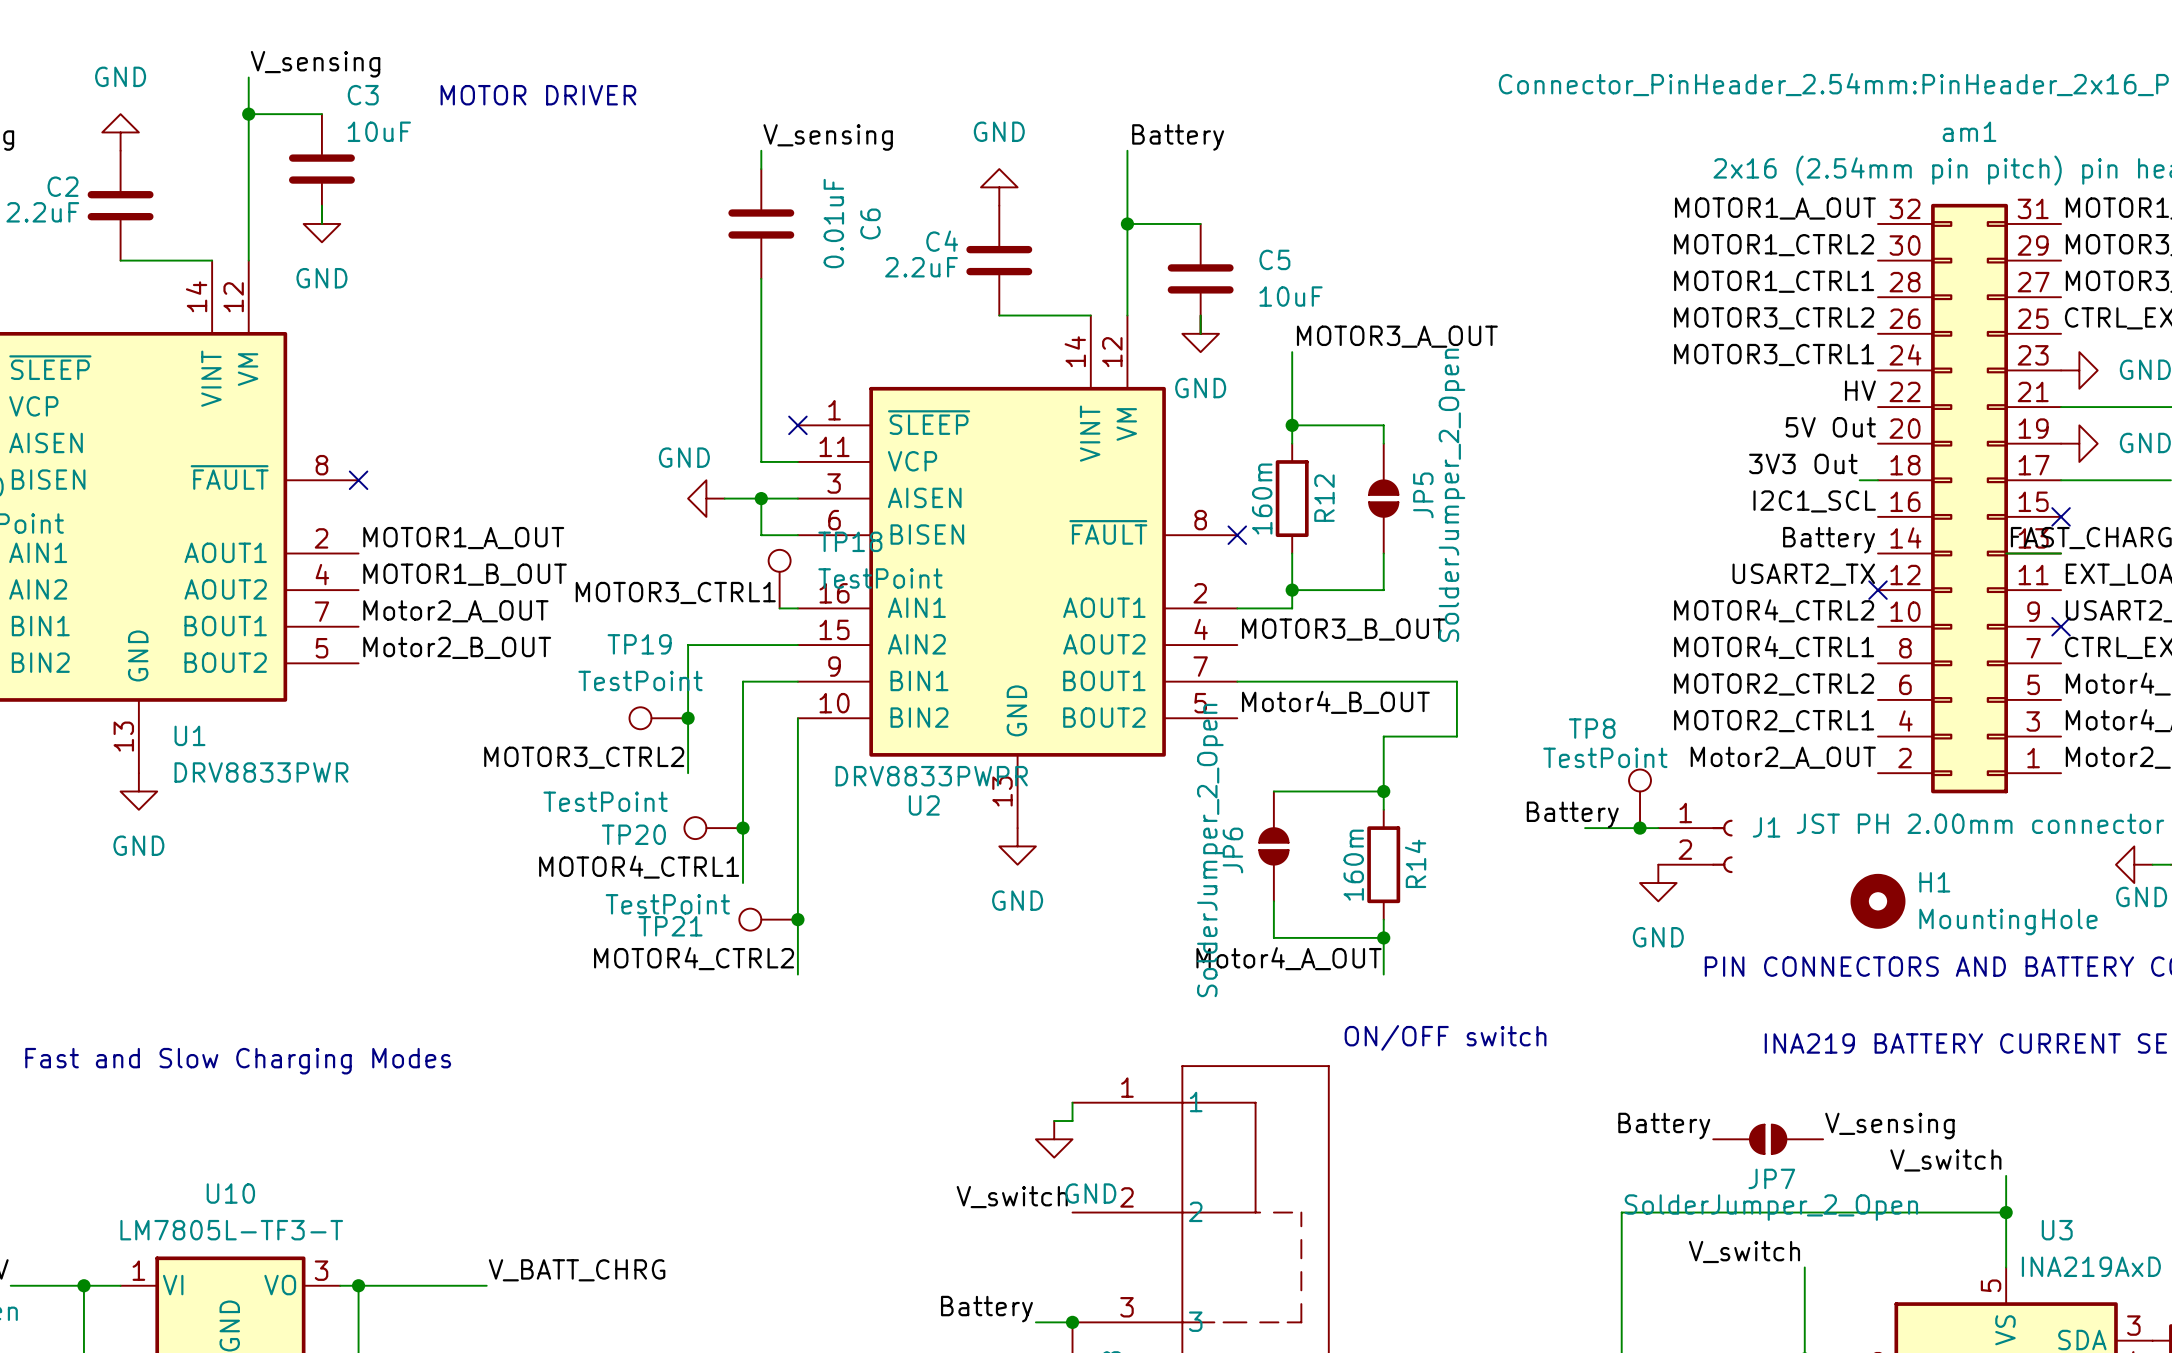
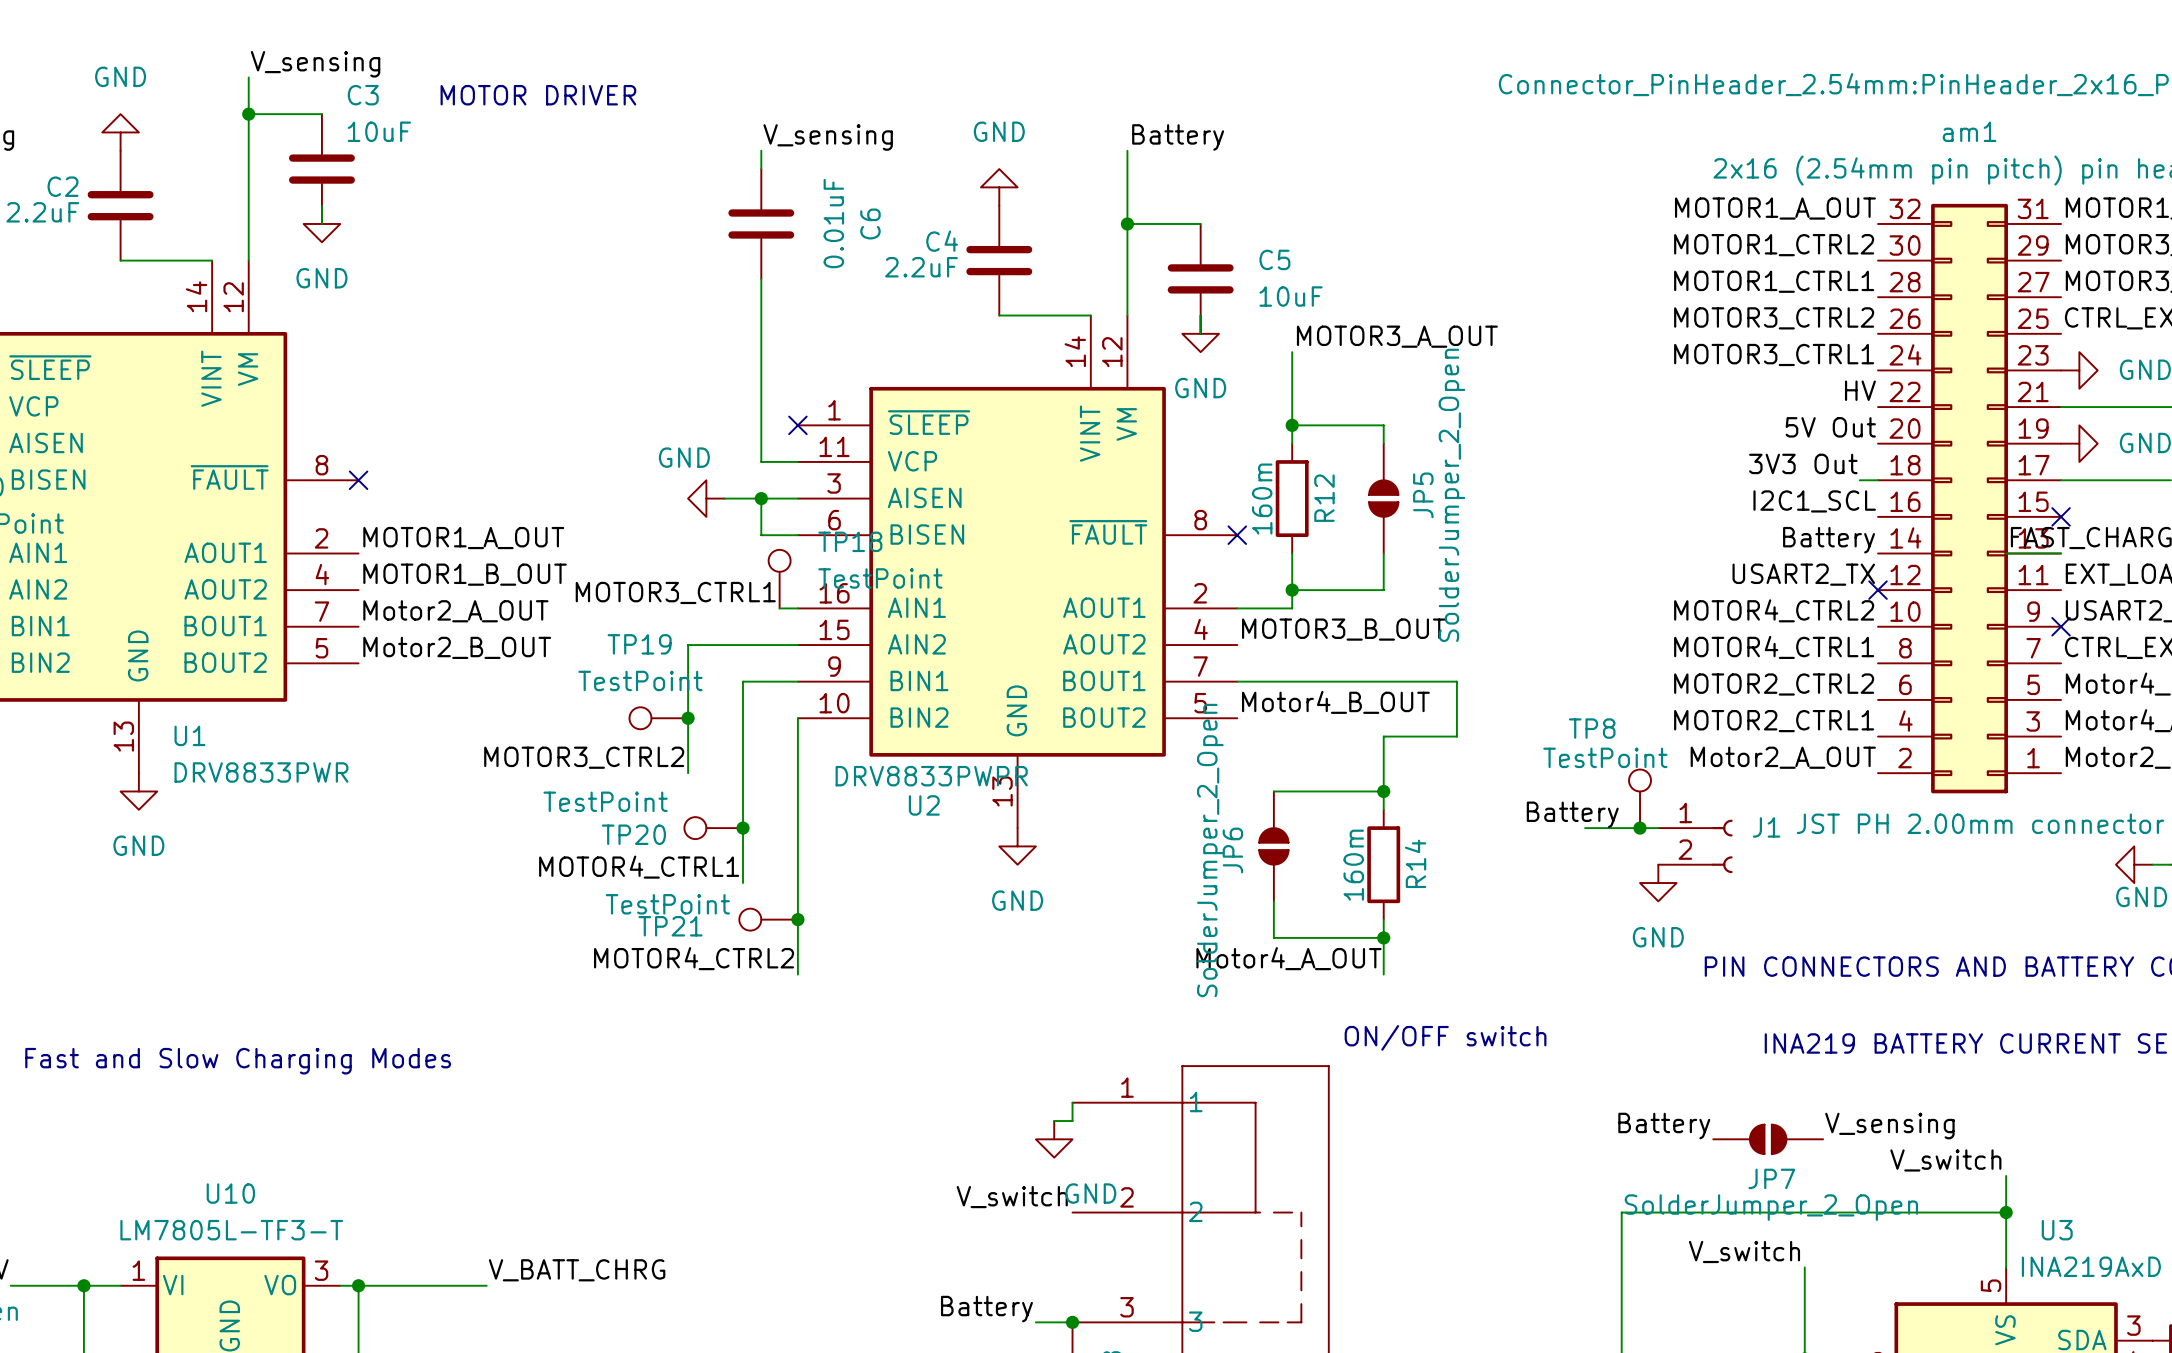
H1: MountingHole (1878, 901) -> none

